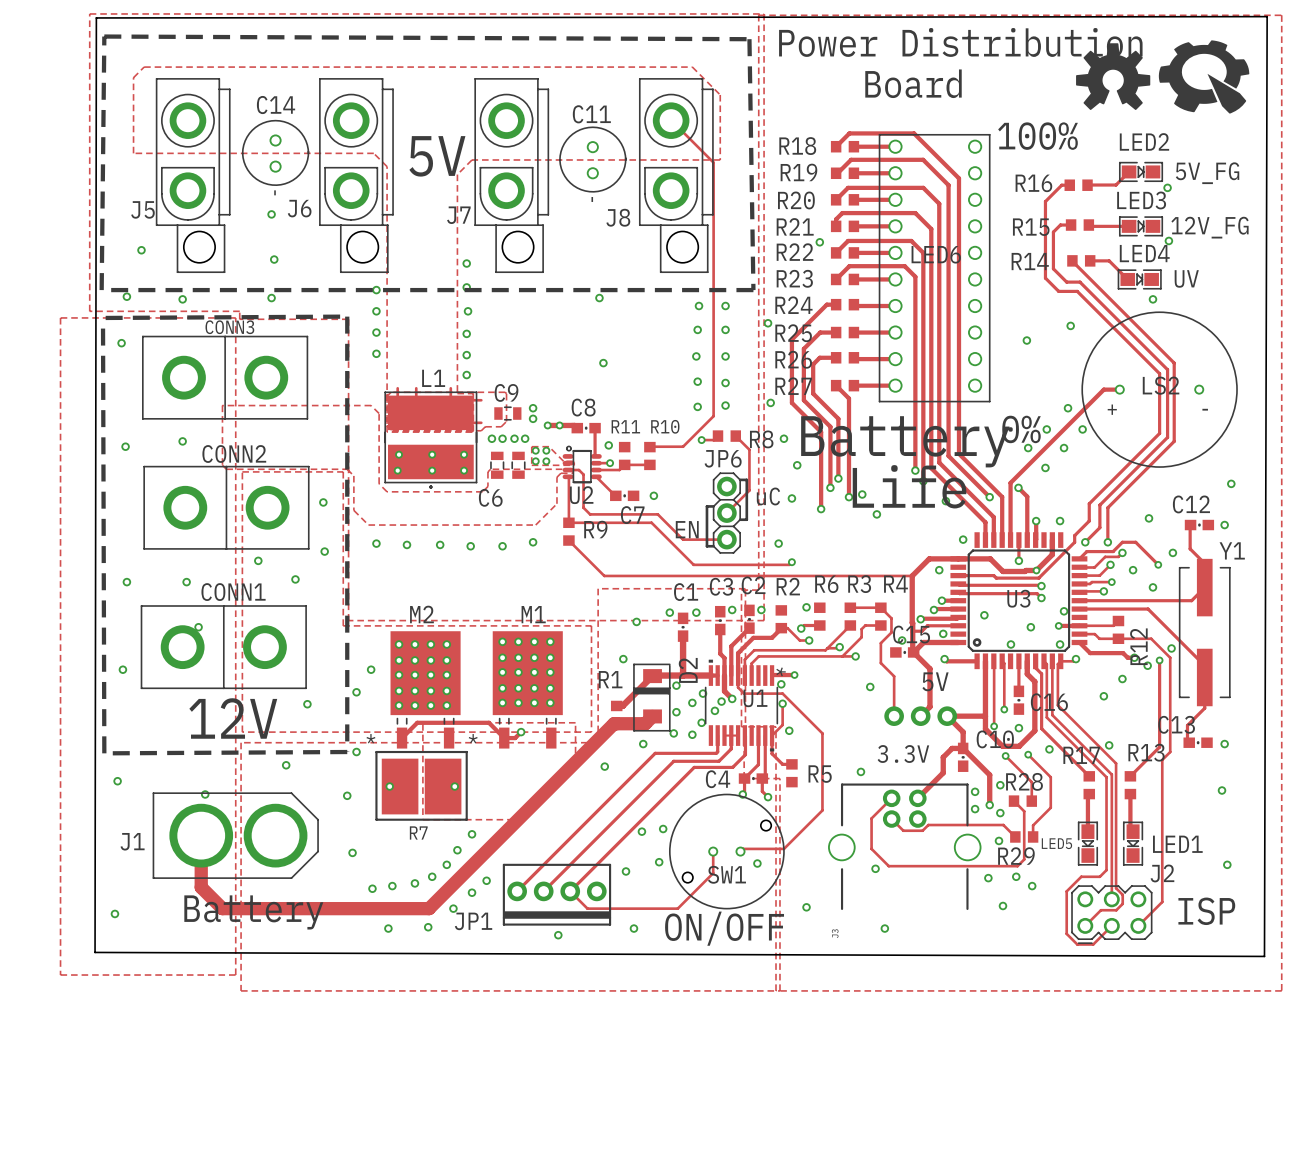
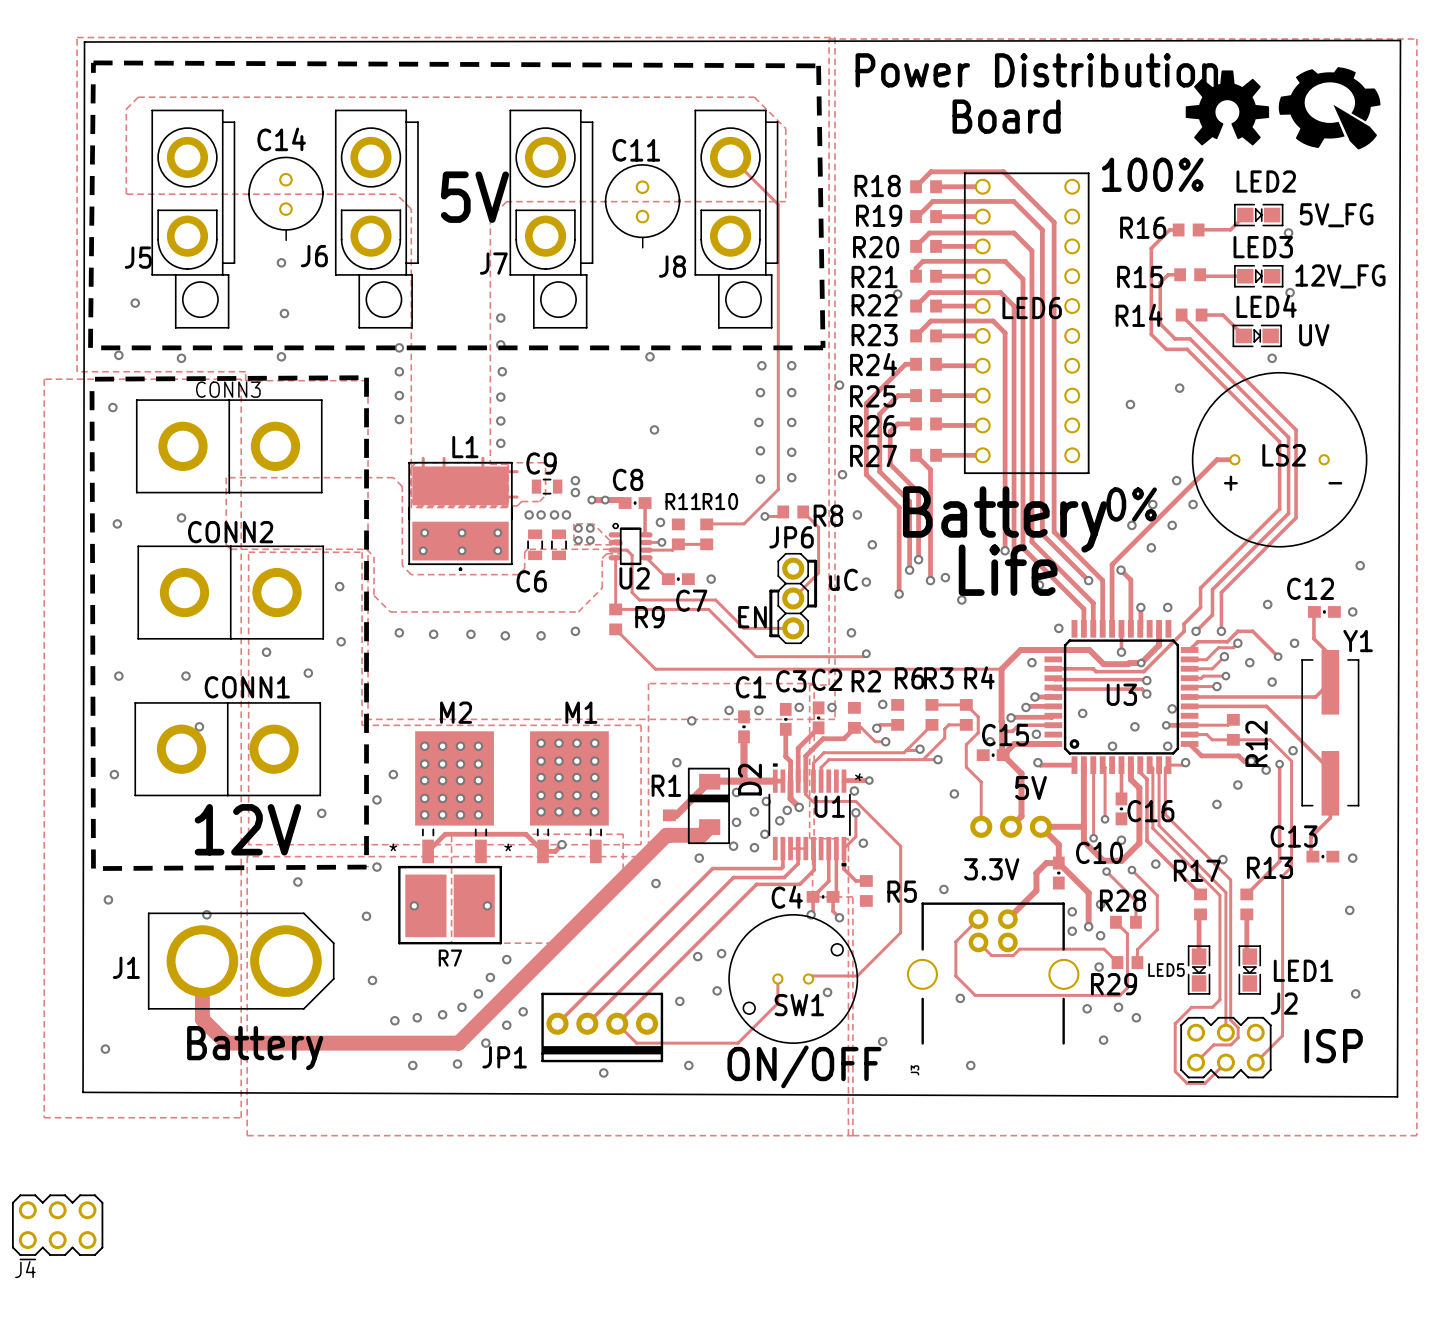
J4: none -> (57, 1227)

